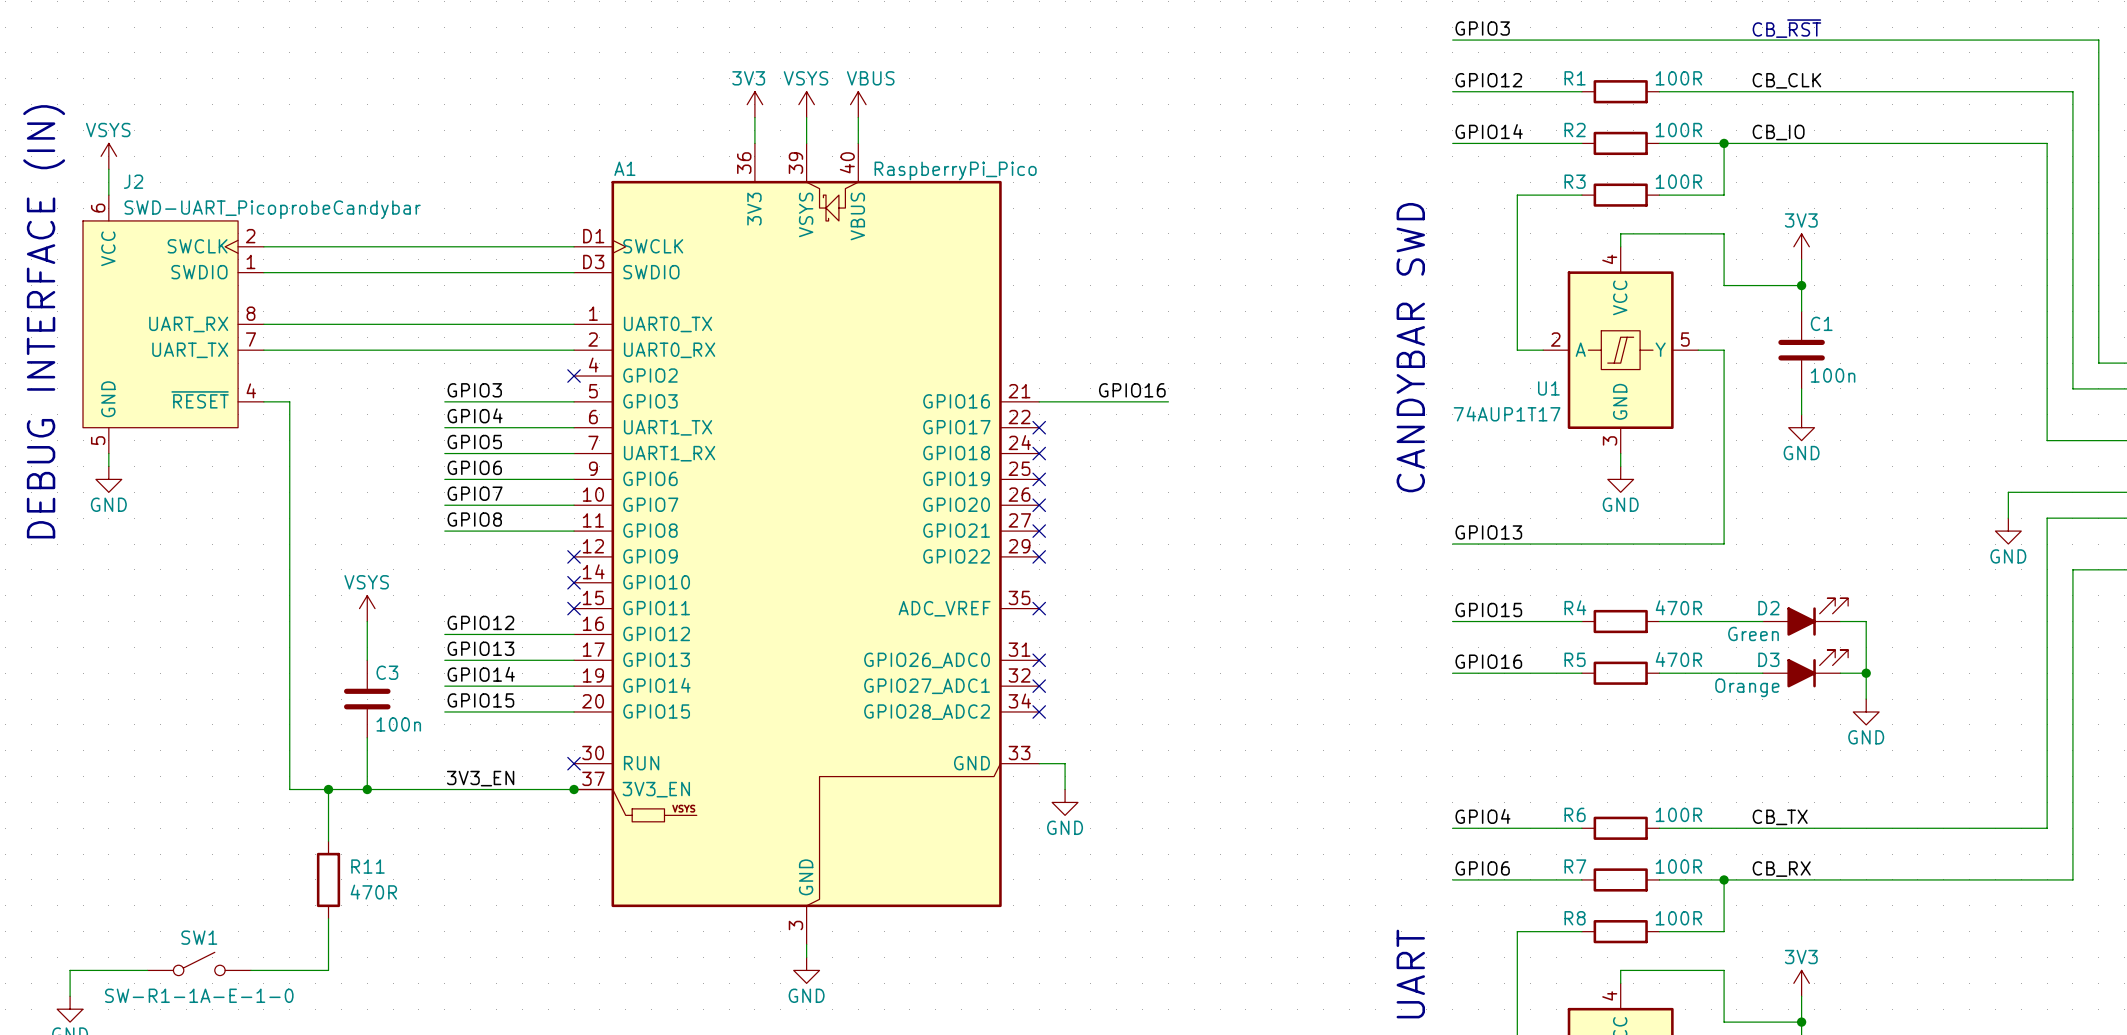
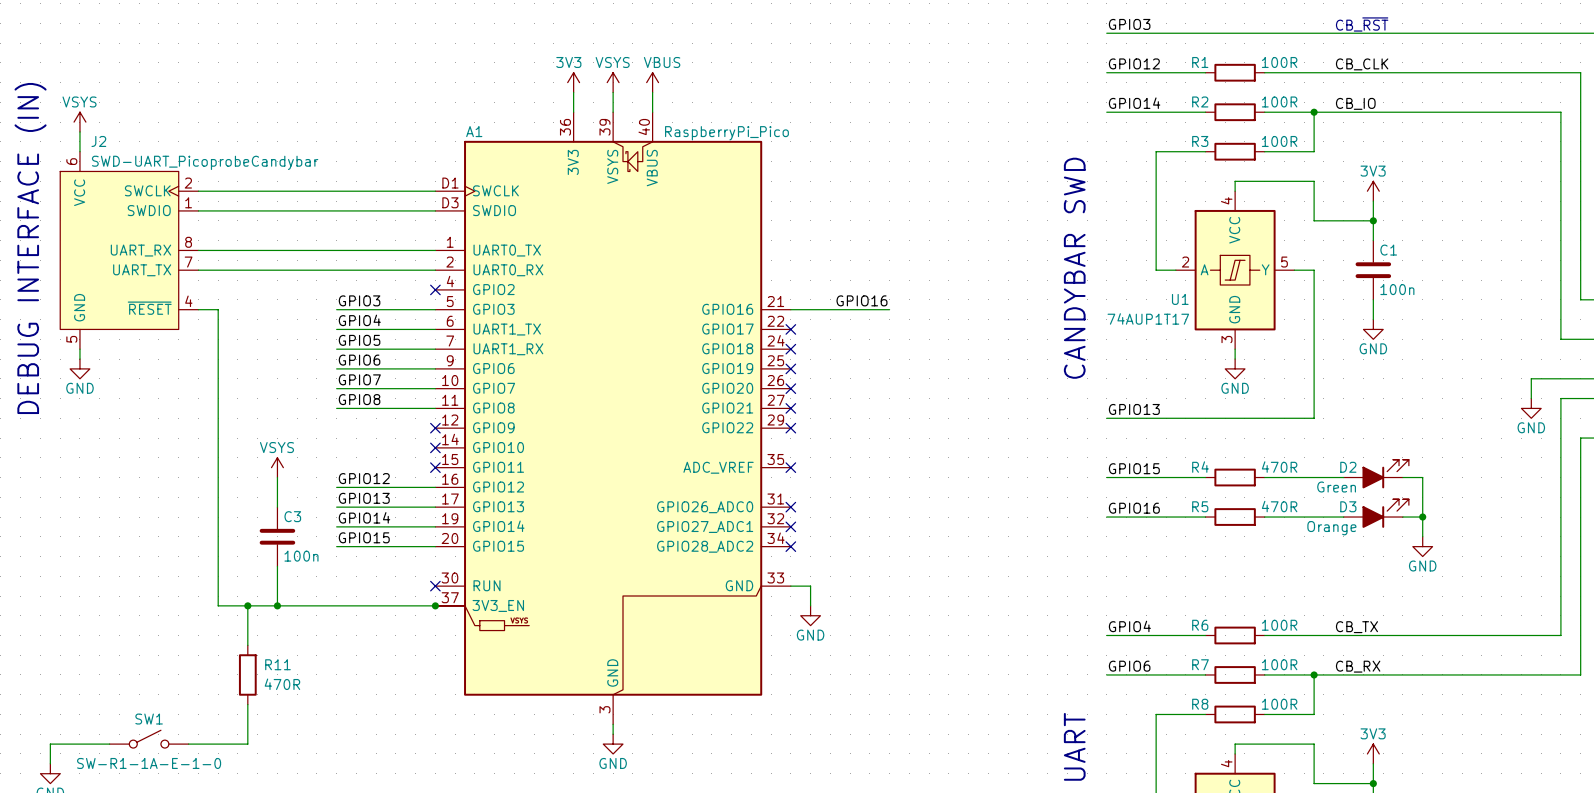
label: 3V3_EN (480, 778) -> none

